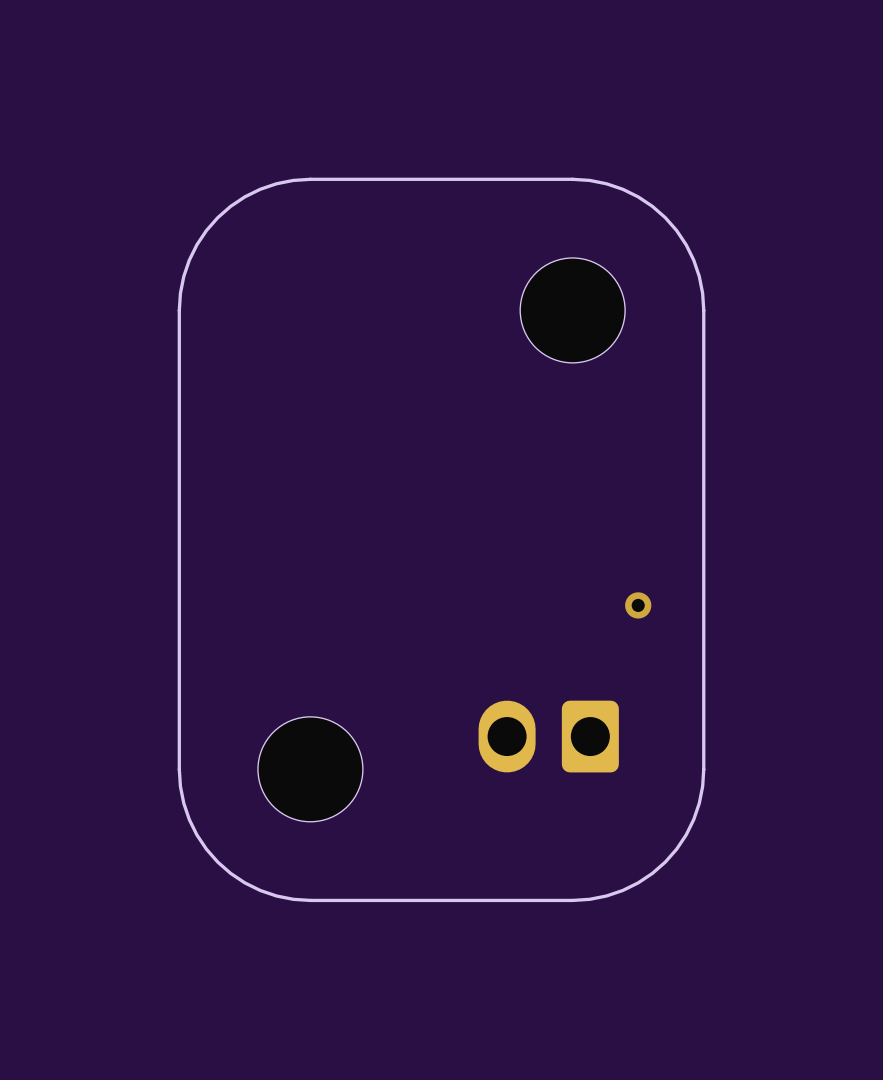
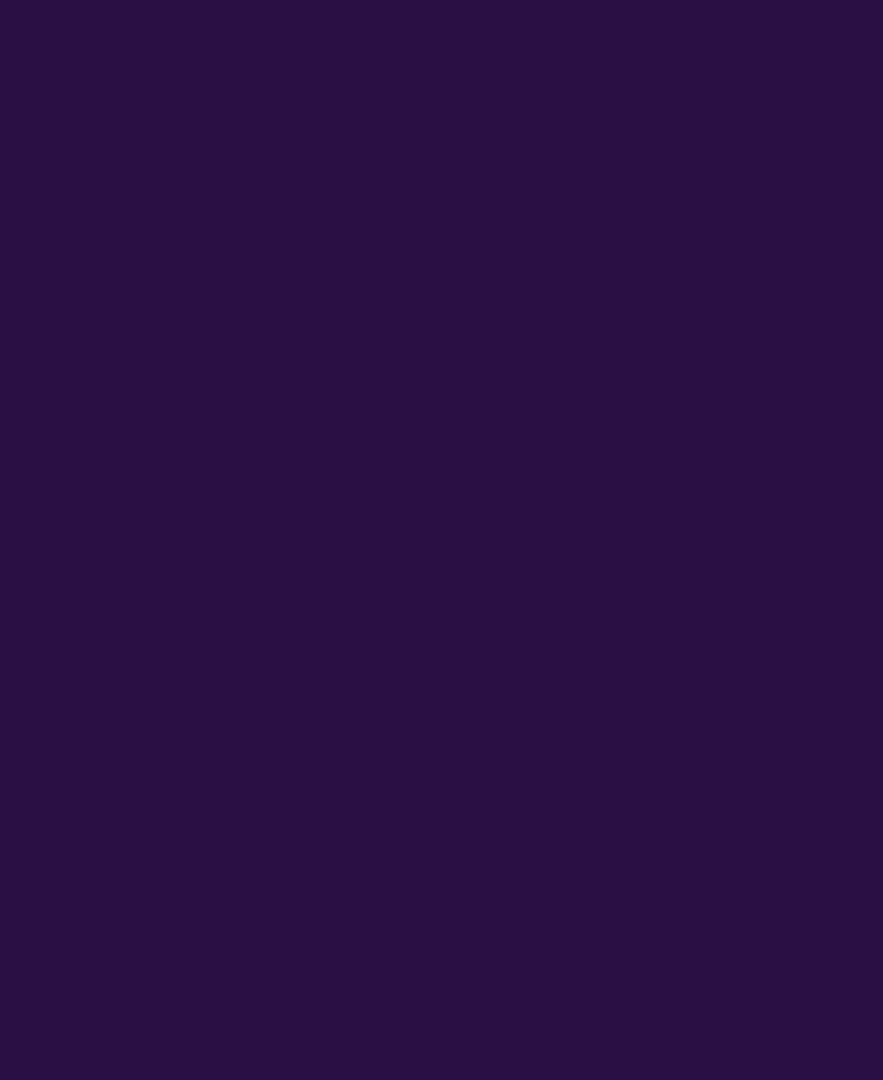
board edge: (572, 179) (310, 179) (276, 183) (260, 189) (230, 206) (206, 230) (189, 260) (180, 293) (179, 310) (180, 786) (189, 819) (206, 849) (230, 873) (260, 890) (293, 899) (310, 900) (589, 899) (622, 890) (652, 873) (676, 849) (693, 819) (702, 786) (703, 769) (702, 293) (693, 260) (676, 230) (665, 217) (652, 206) (622, 189) (606, 183) (572, 179) -> none
part: (572, 310) -> none
via: (638, 605) -> none
part: (548, 736) -> none
part: (310, 769) -> none

